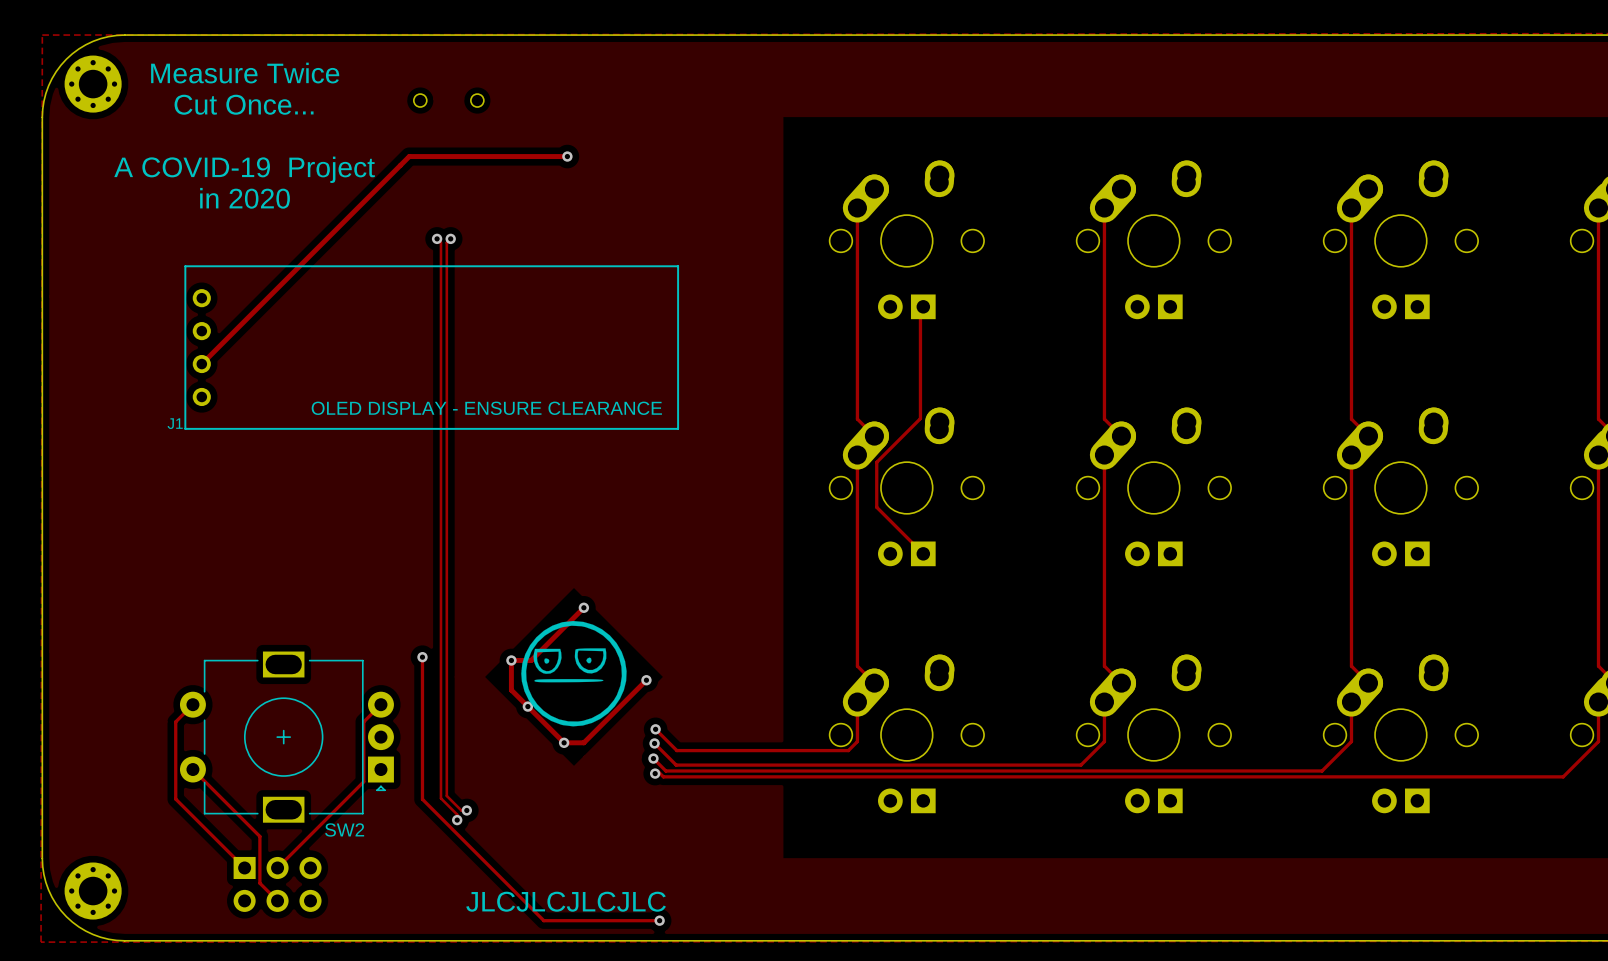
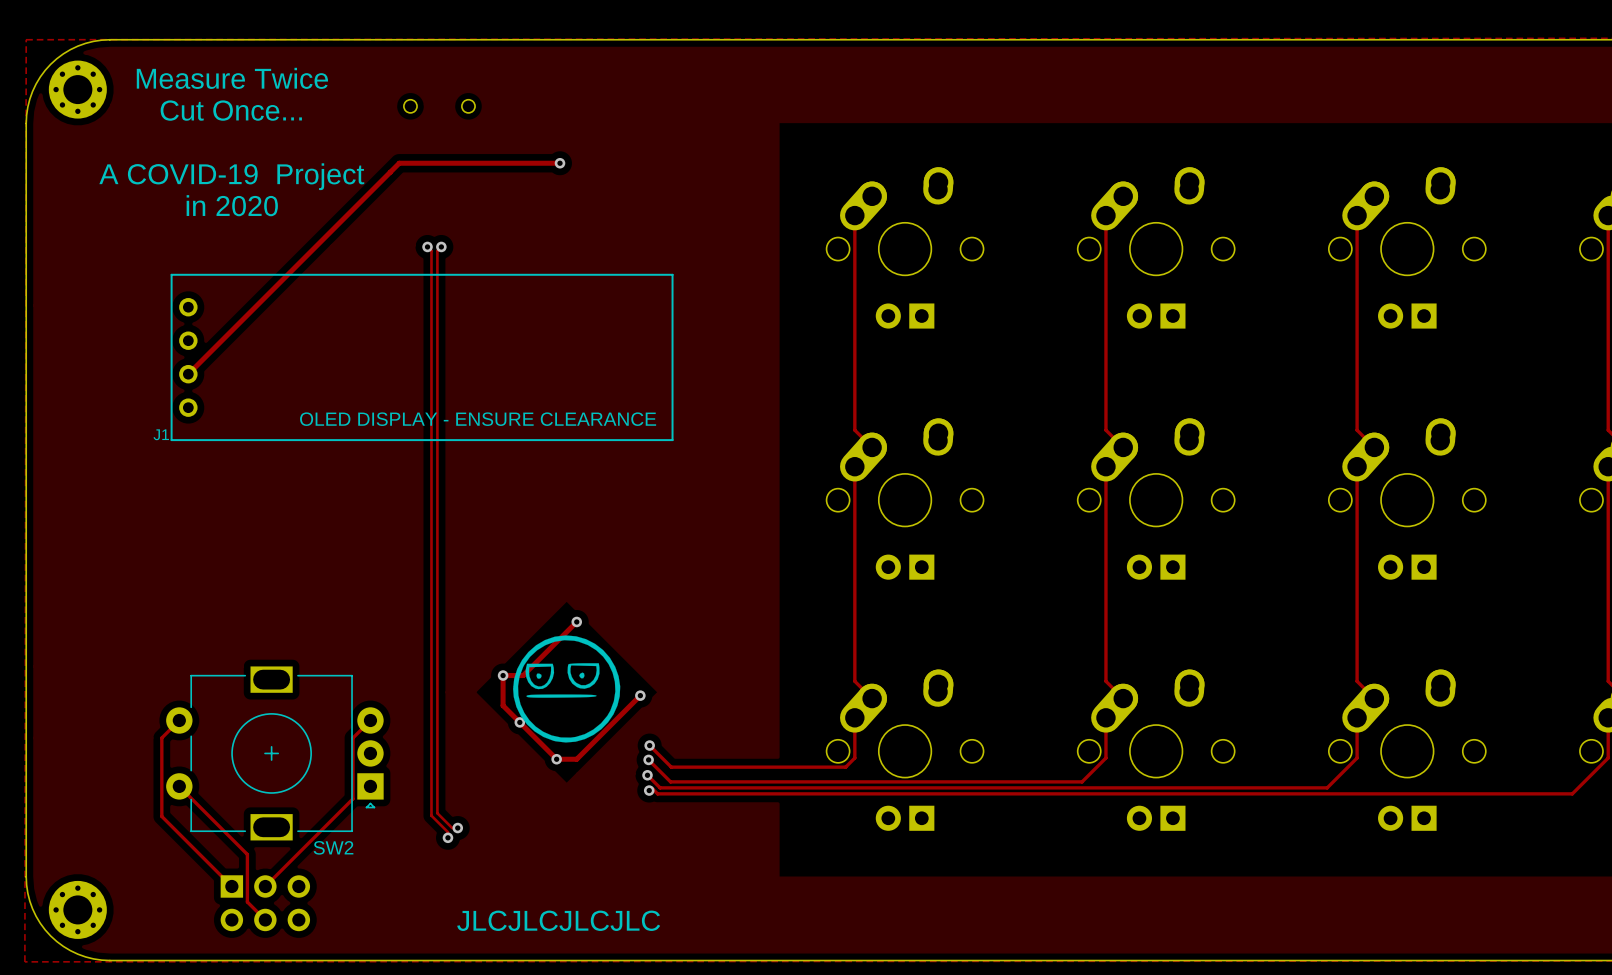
track: (923, 306) (920, 309) (920, 418) (876, 462) (876, 507) (923, 553) -> none
track: (422, 657) (422, 799) (543, 920) (659, 920) -> none
via: (422, 657) -> none
via: (659, 920) -> none

